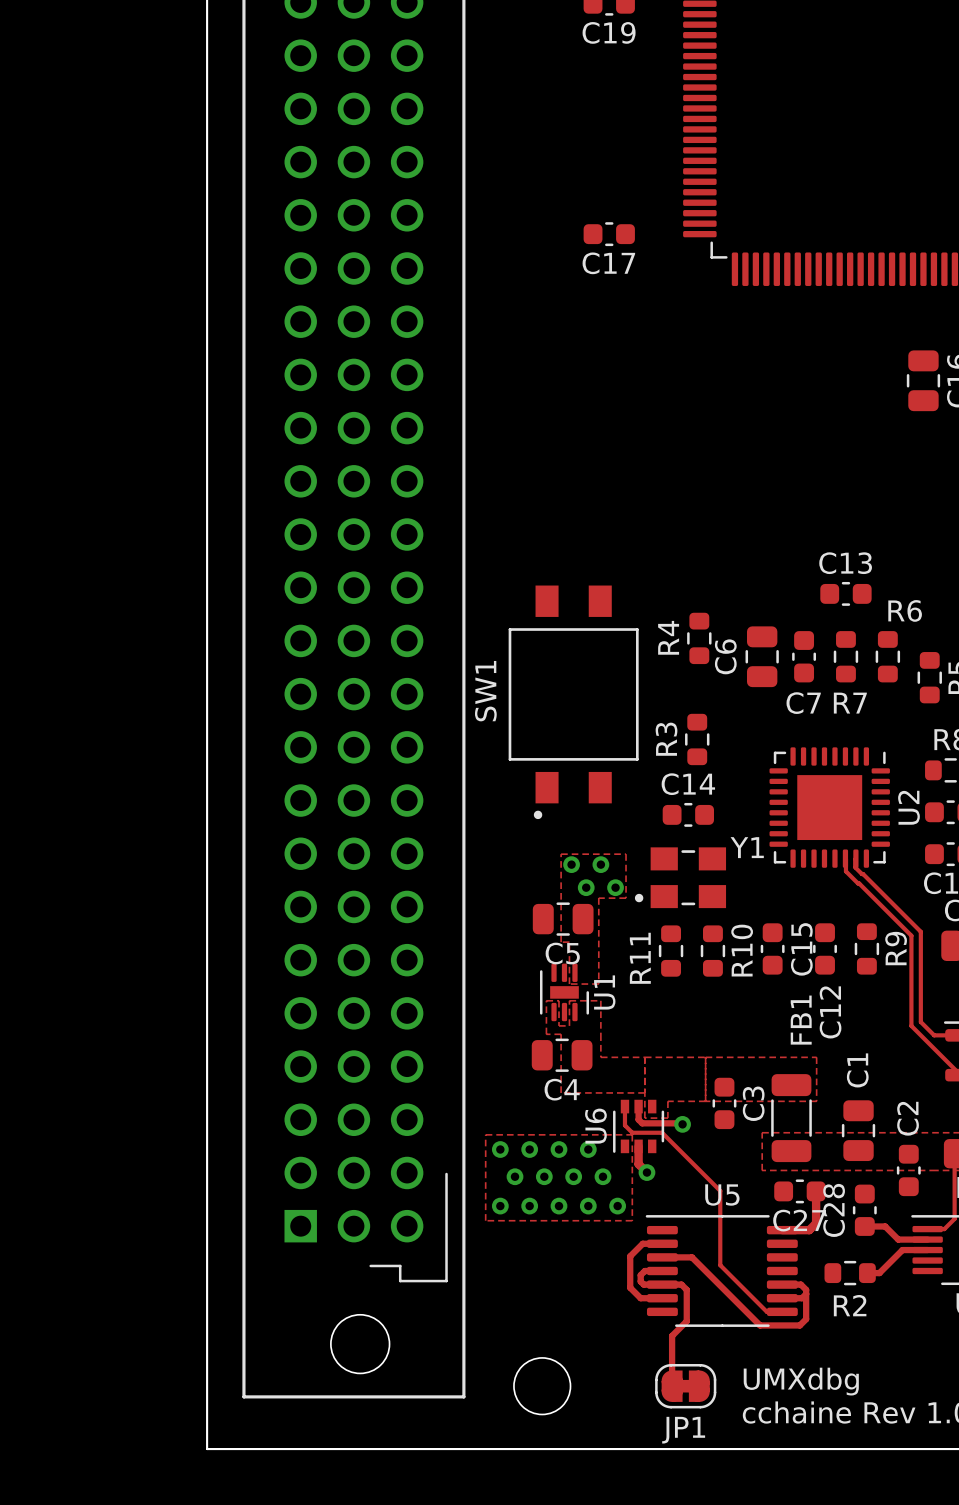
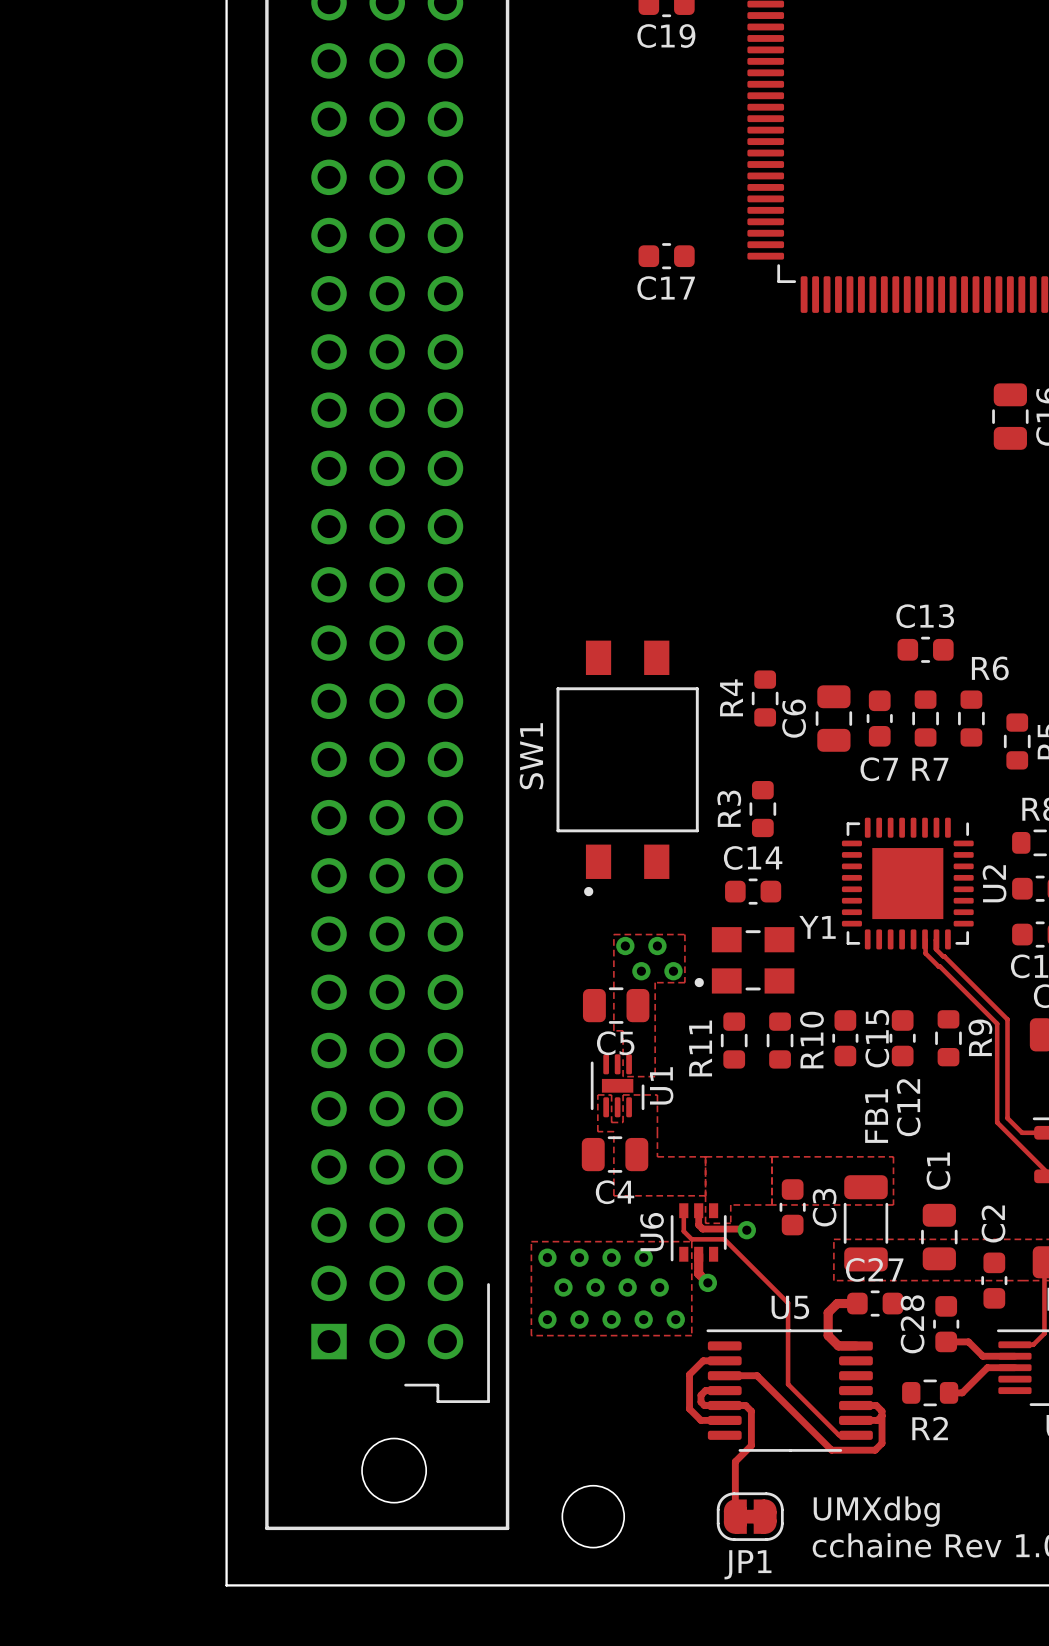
top track: (816, 1191) (816, 1223) (809, 1230) (782, 1230) -> (857, 1303) (837, 1303) (828, 1312) (828, 1335) (838, 1345) (855, 1345)
C27 name position: C27 (799, 1220) -> C27 (874, 1269)

